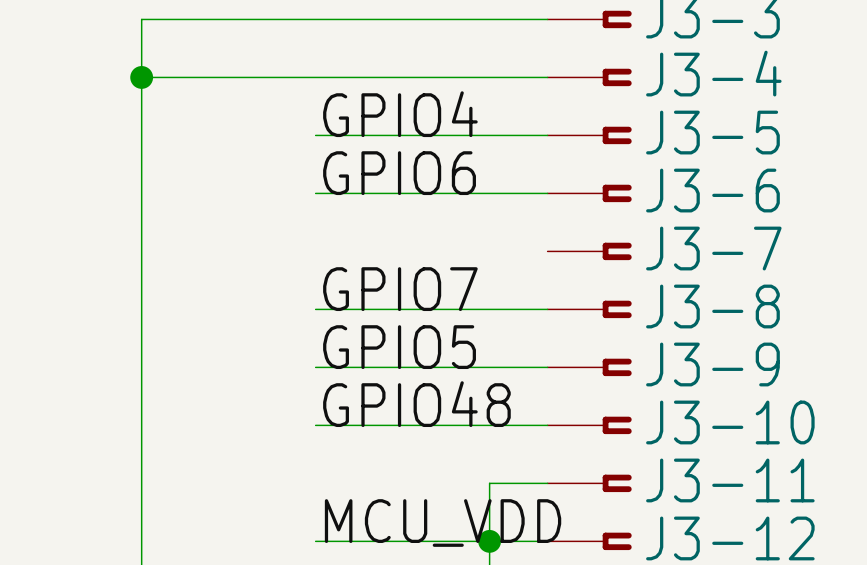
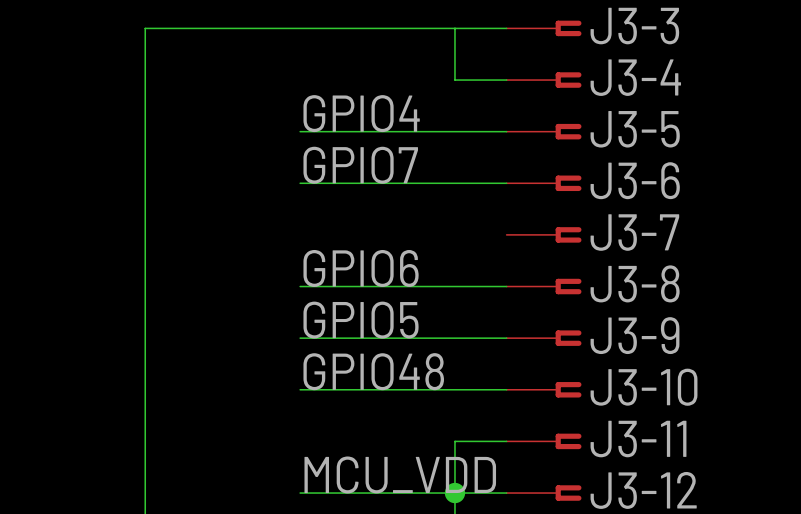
wire: (141, 77) (489, 77) -> (454, 28) (454, 80)
junction: (141, 77) -> none
label: GPIO6 (399, 173) -> GPIO7 (360, 165)
label: GPIO7 (400, 289) -> GPIO6 (361, 268)

